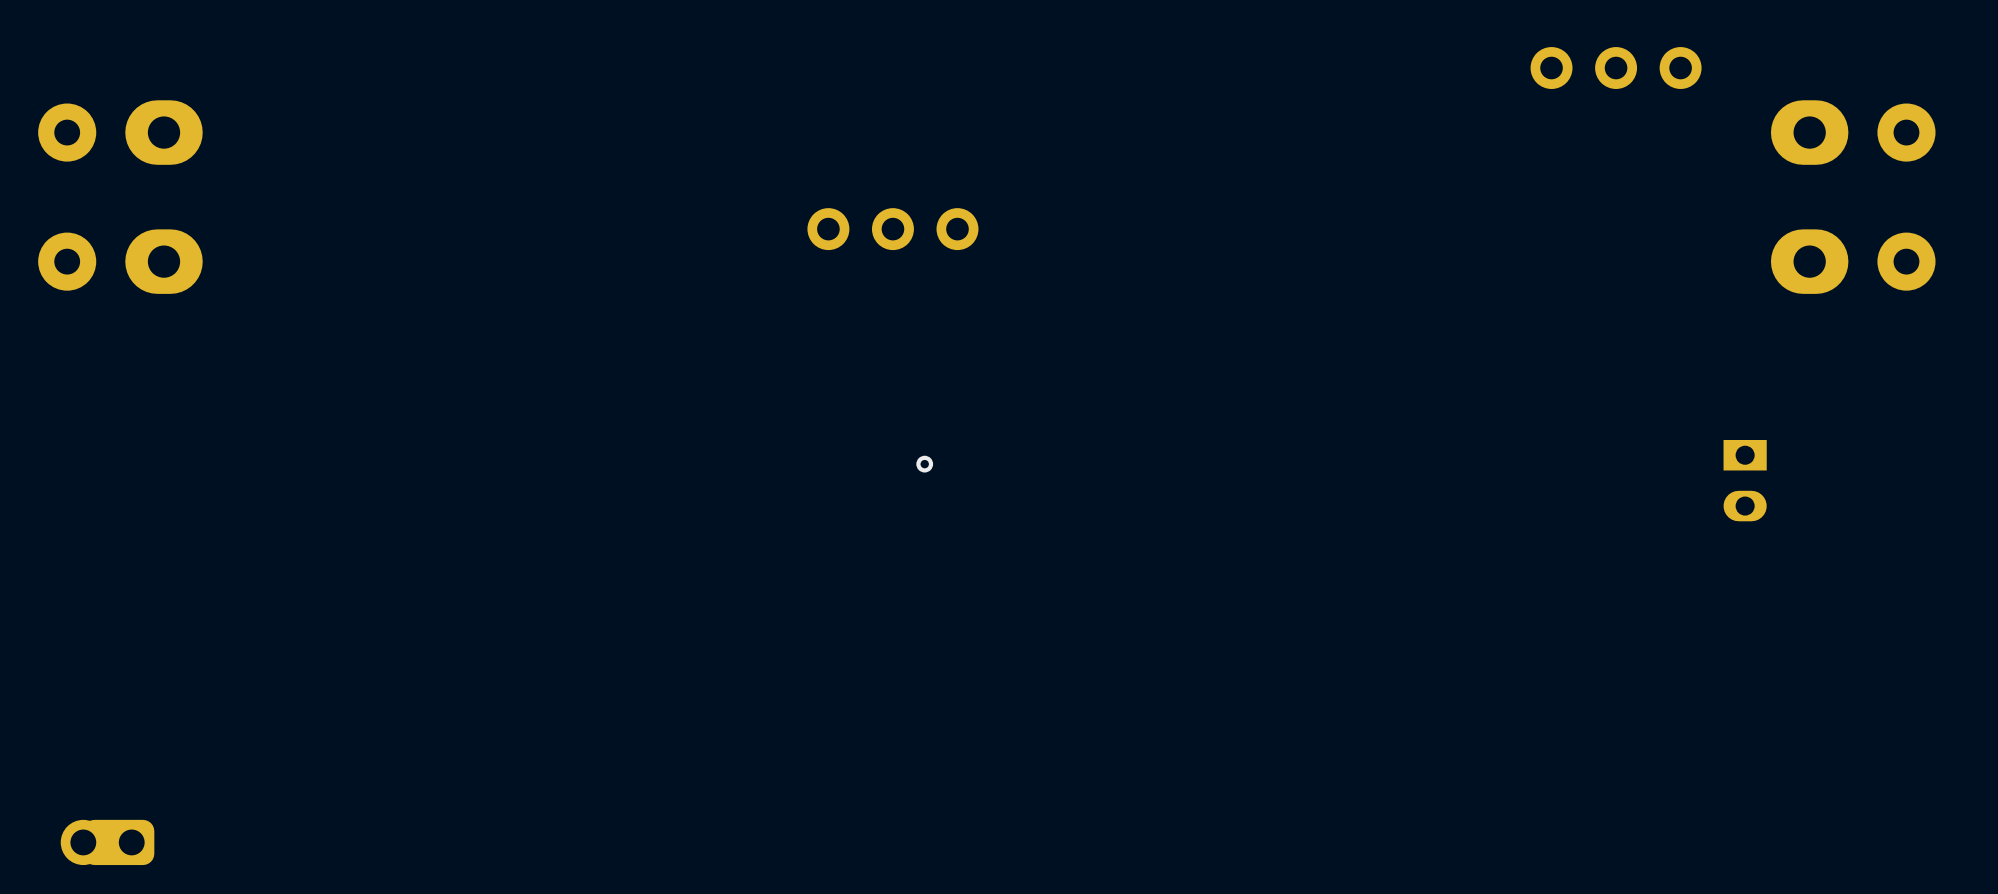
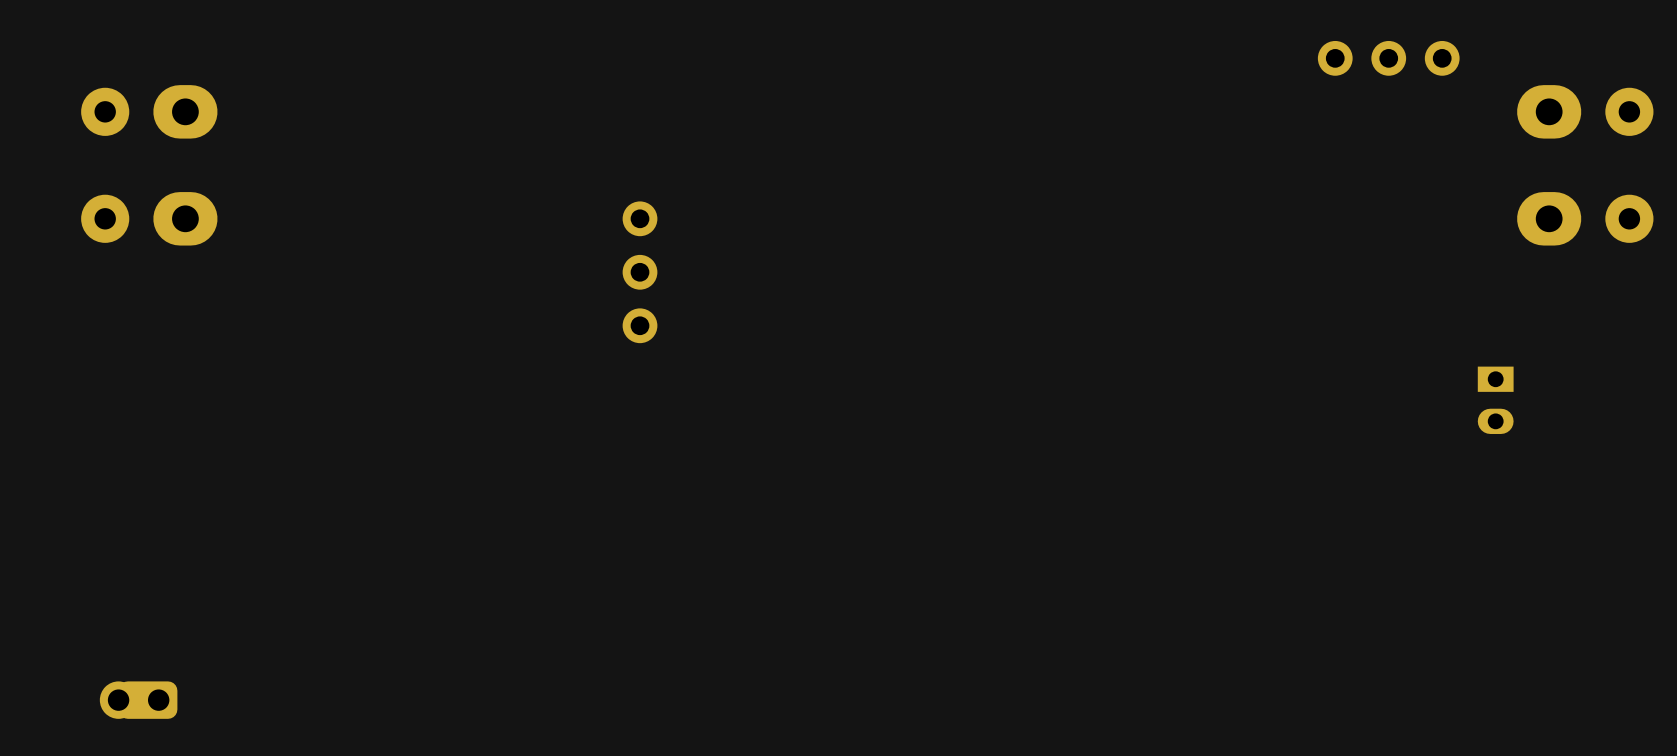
part rotation: 0° (892, 229) -> 90° clockwise (640, 272)
part position: (892, 229) -> (640, 272)
via: (924, 464) -> none

